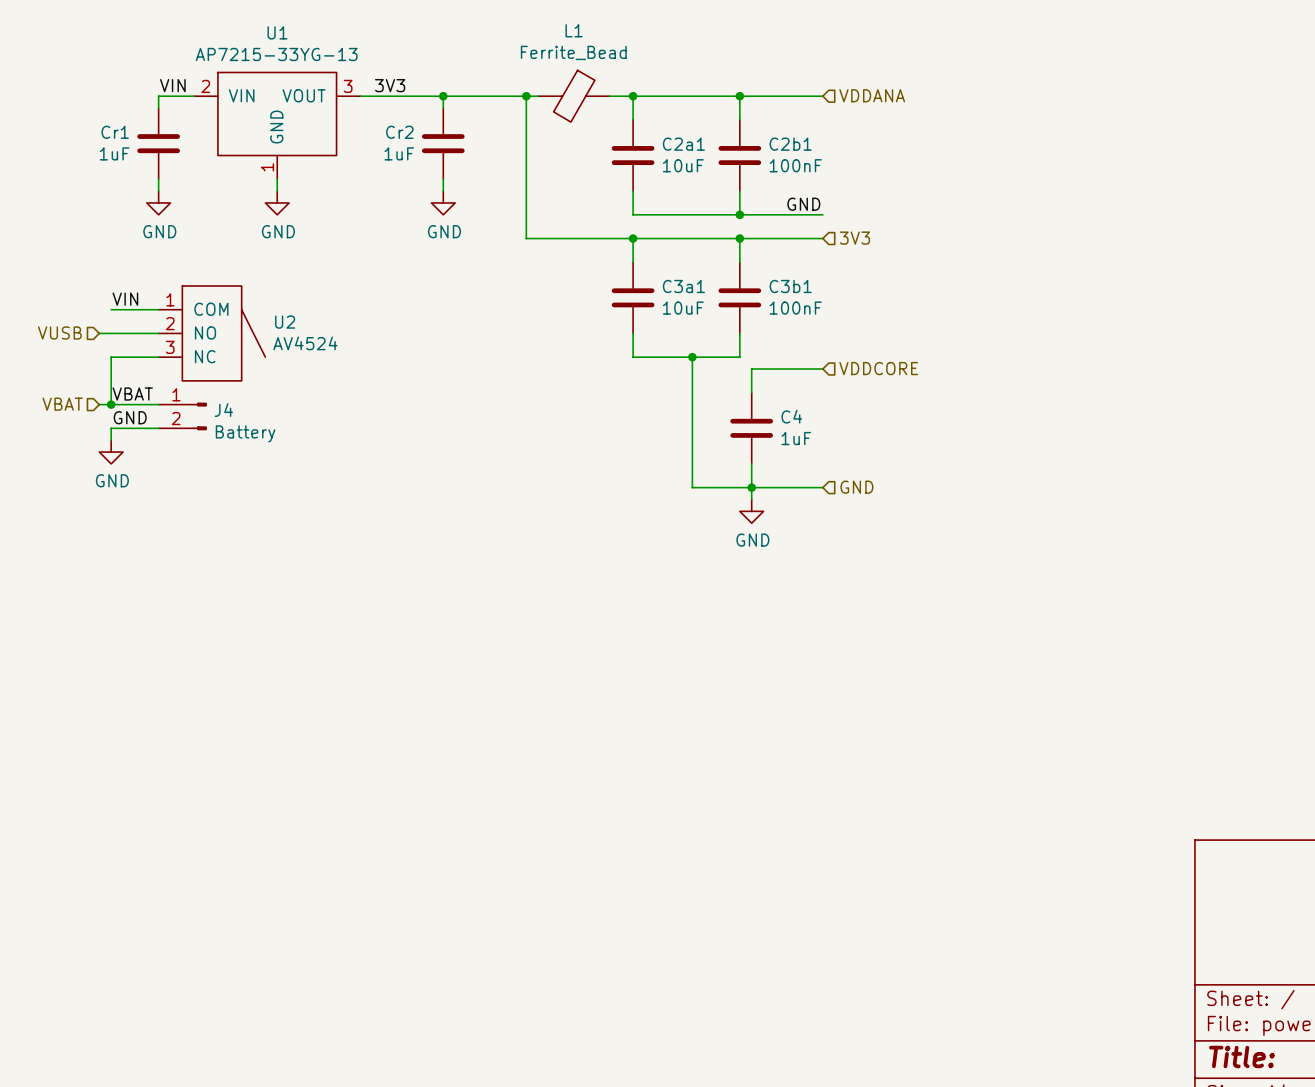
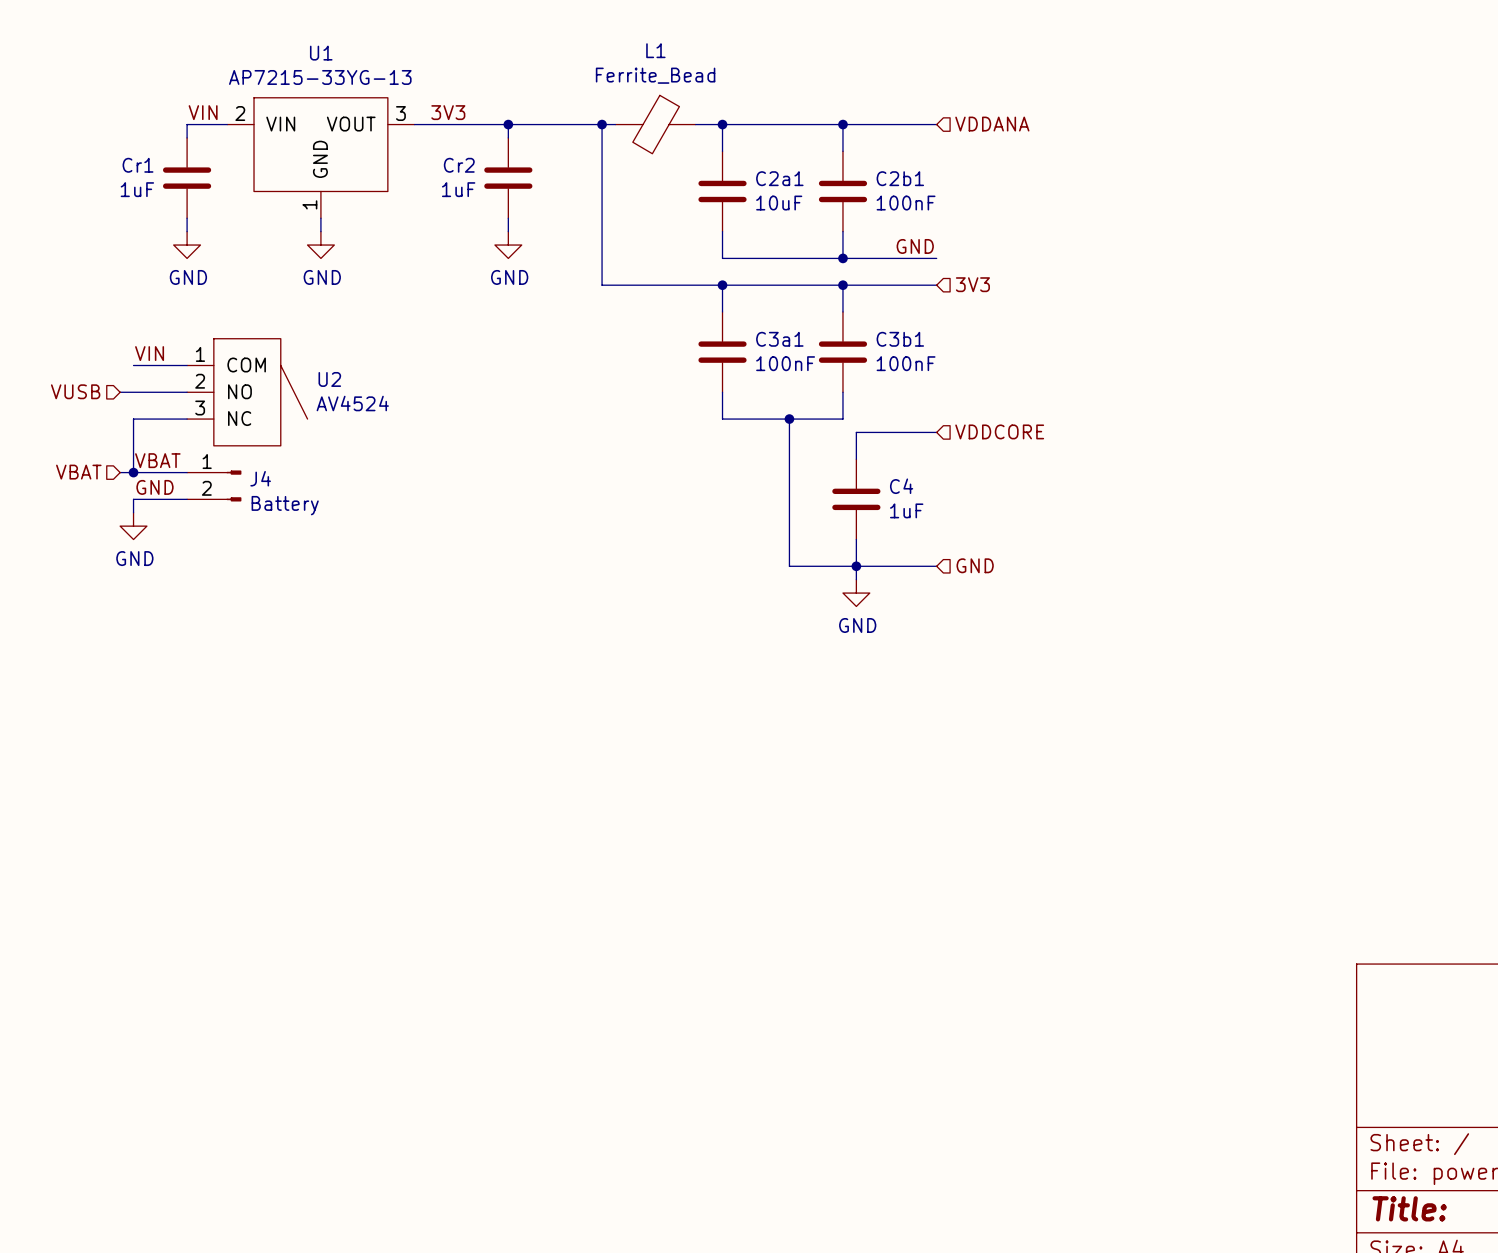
C3a1 value: 10uF (683, 308) -> 100nF (785, 363)

